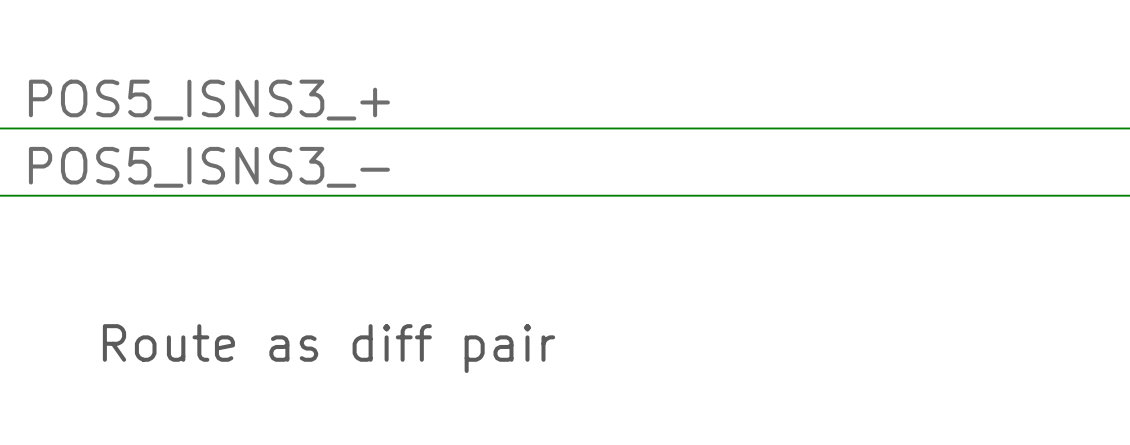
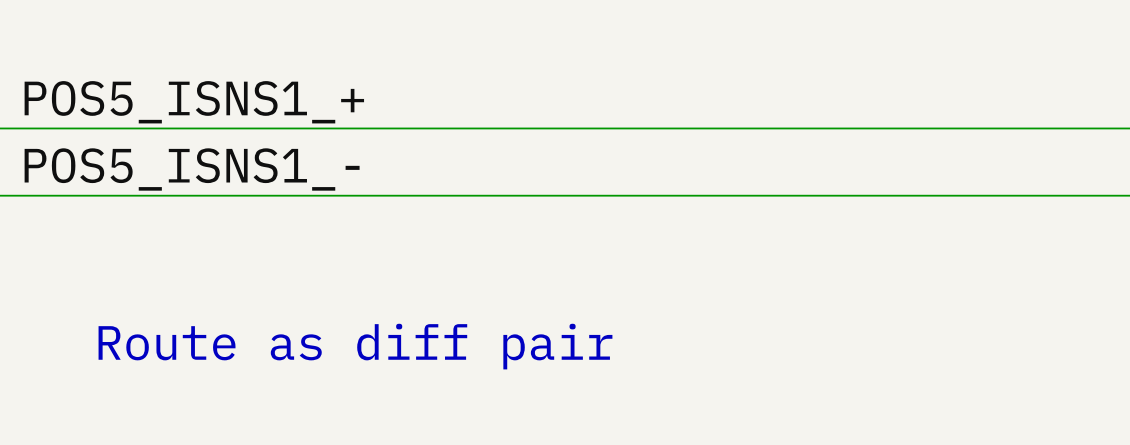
label: POS5_ISNS3_+ (209, 100) -> POS5_ISNS1_+ (194, 102)
label: POS5_ISNS3_- (209, 167) -> POS5_ISNS1_- (192, 169)

